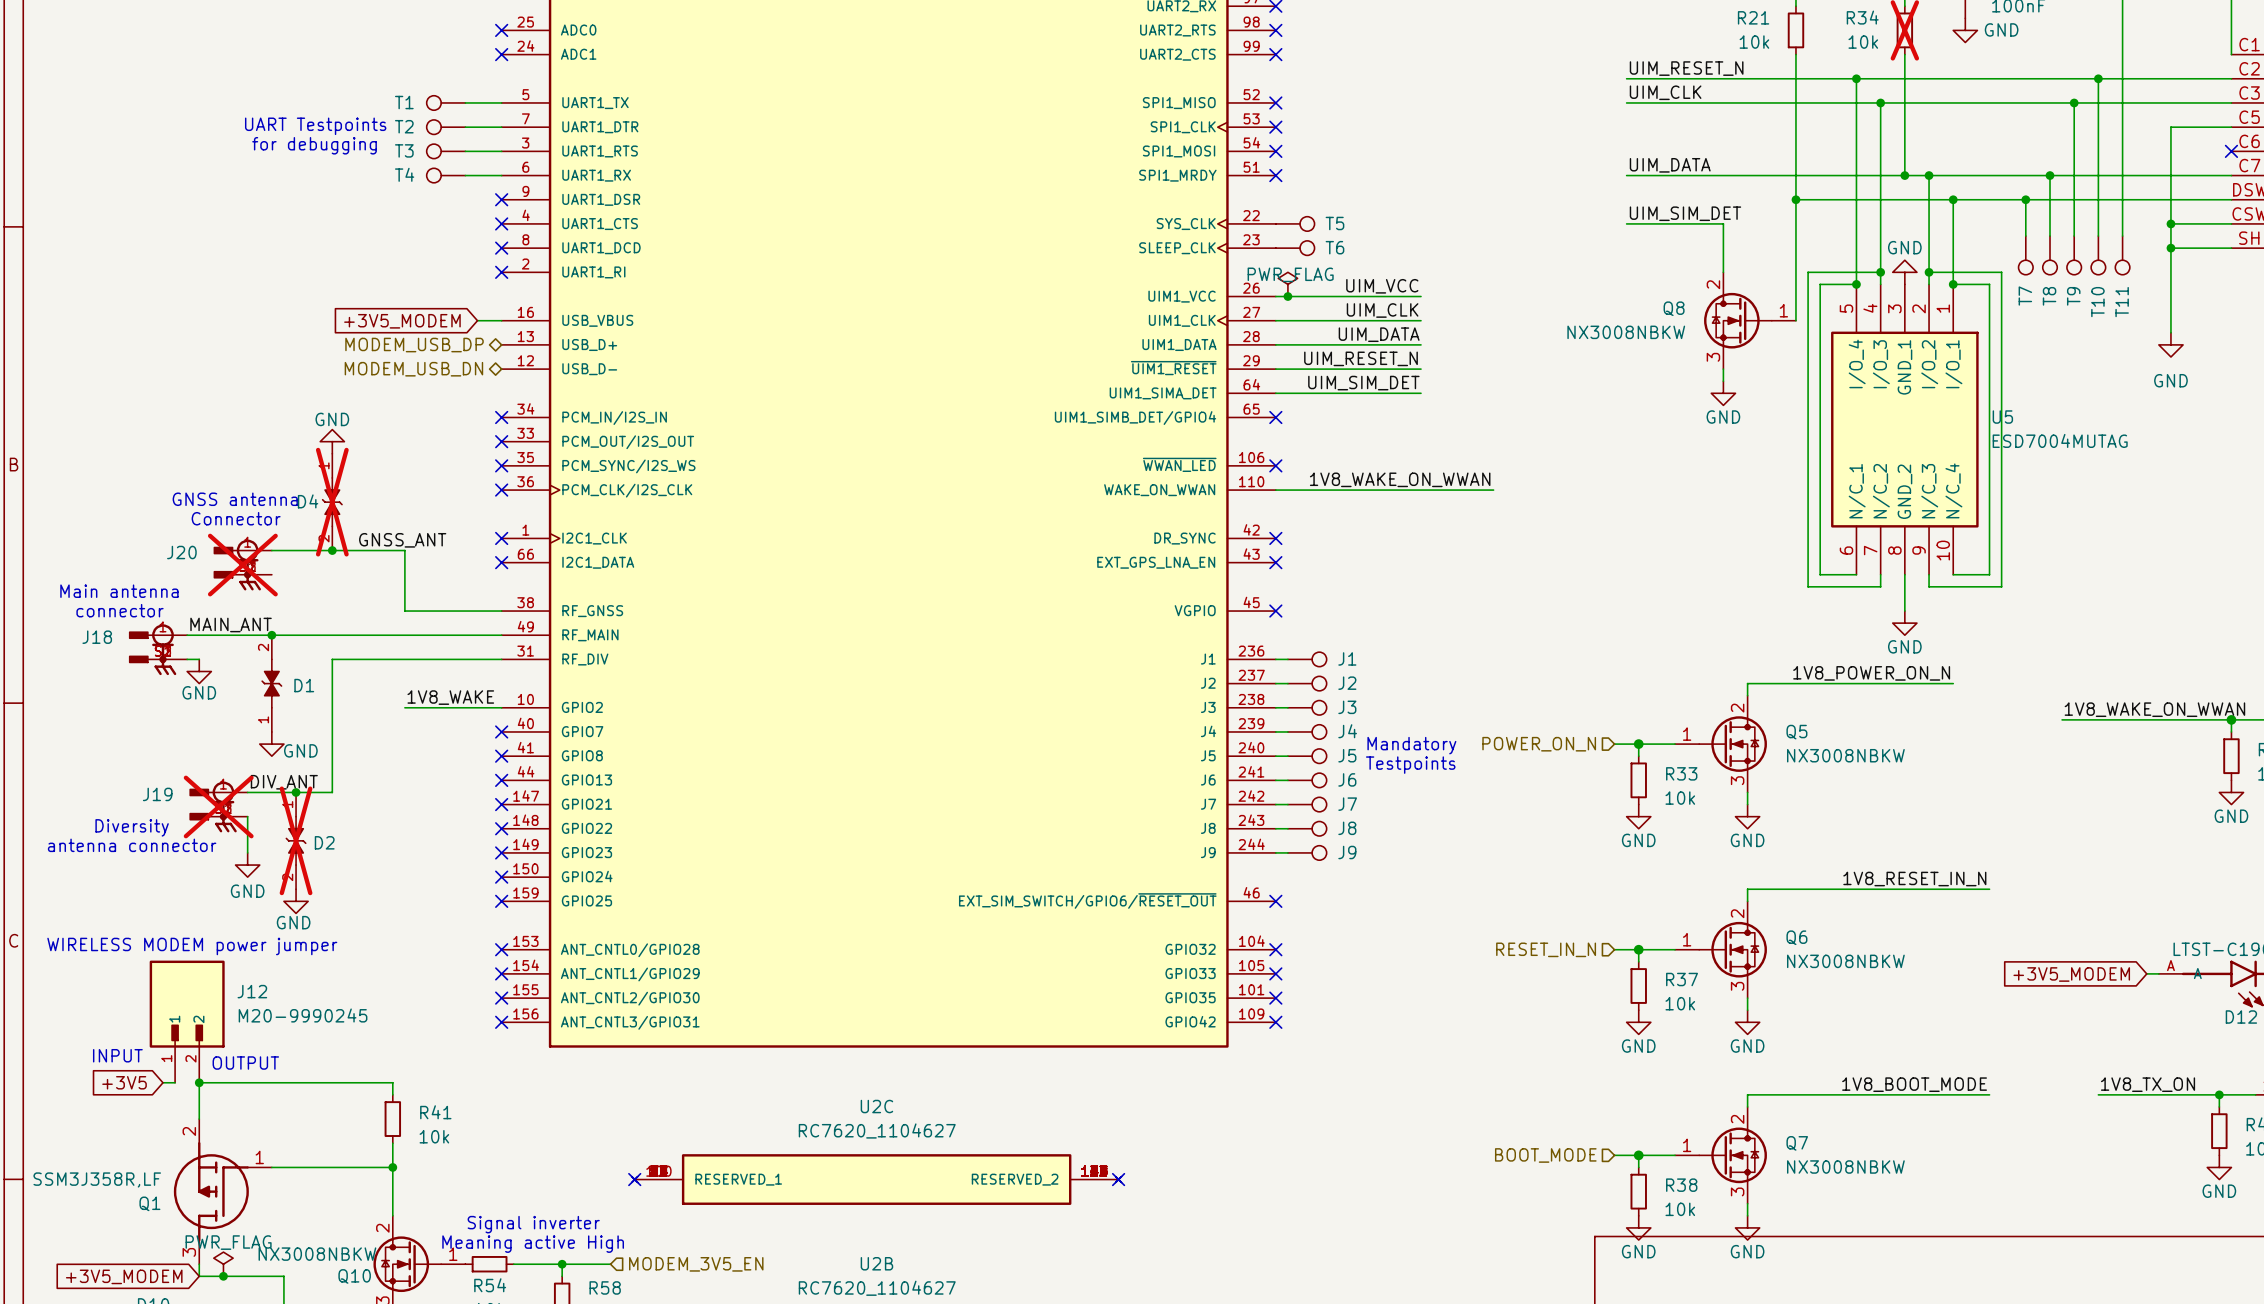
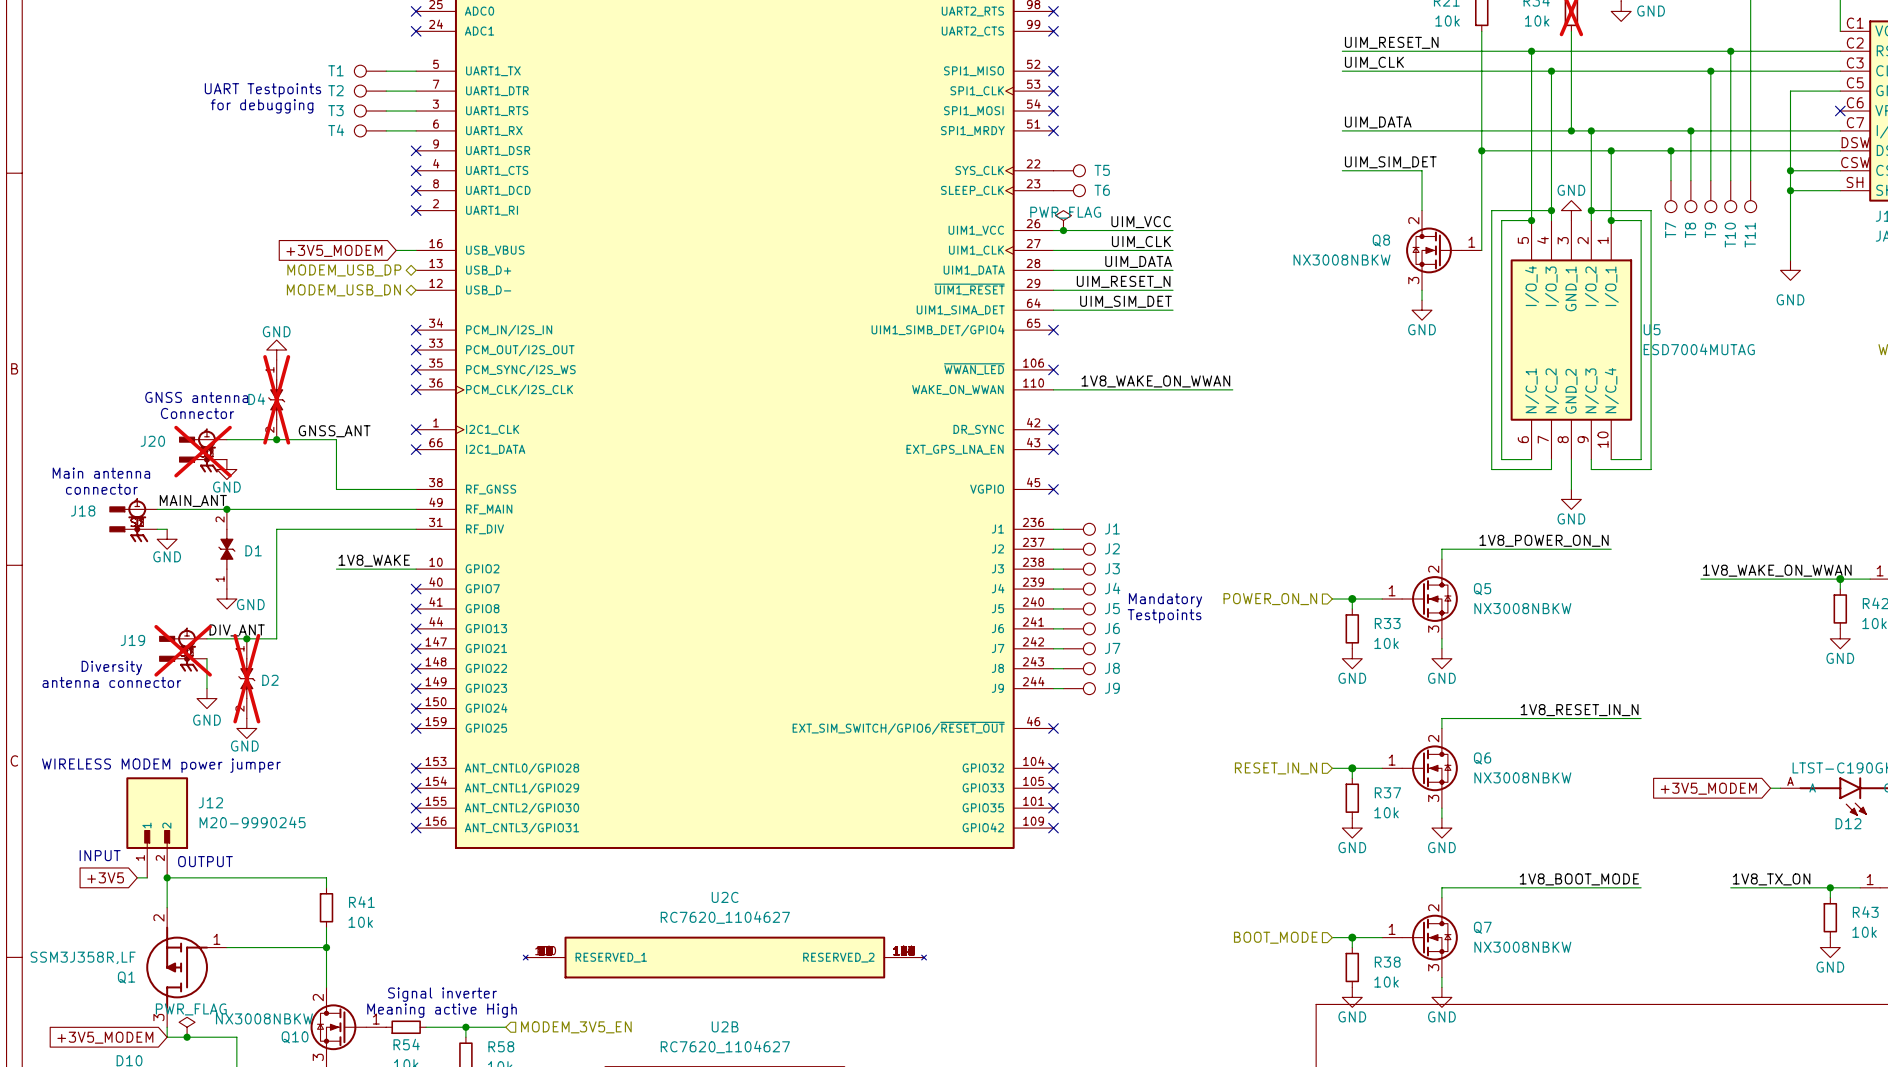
power symbol: none -> GND (226, 469)
no-connect mark: (634, 1179) -> none
no-connect mark: (1118, 1179) -> none

